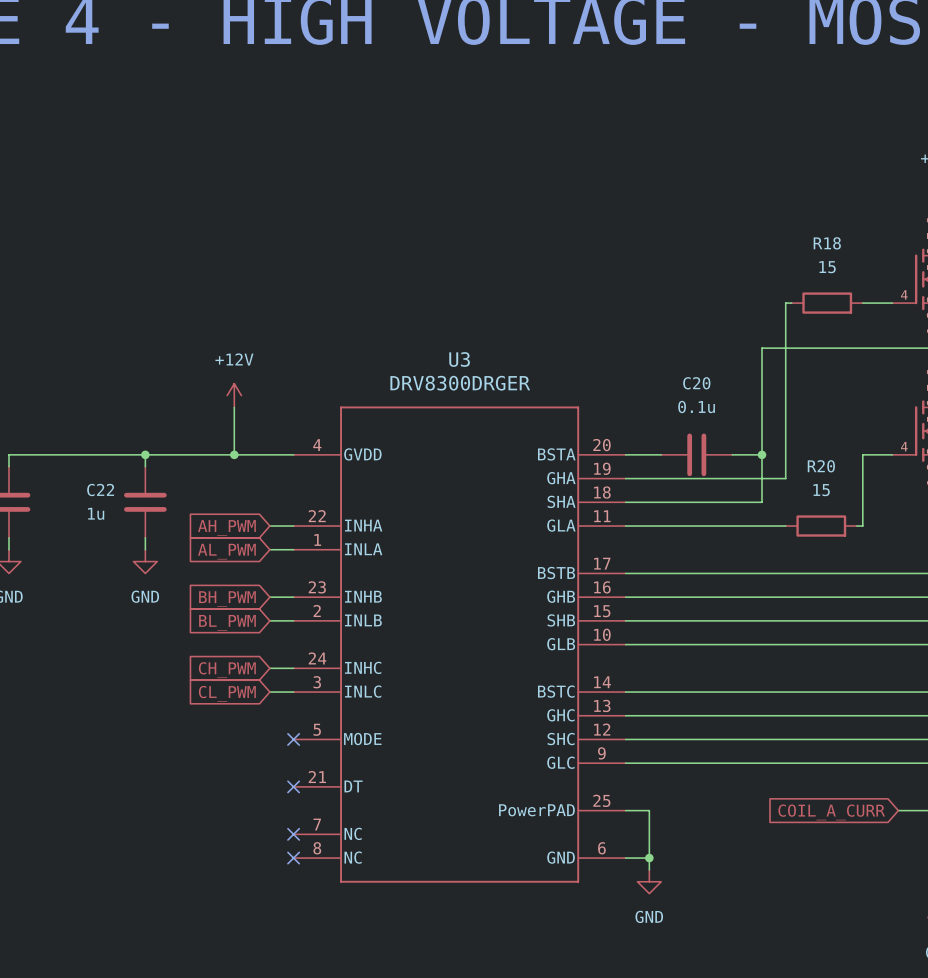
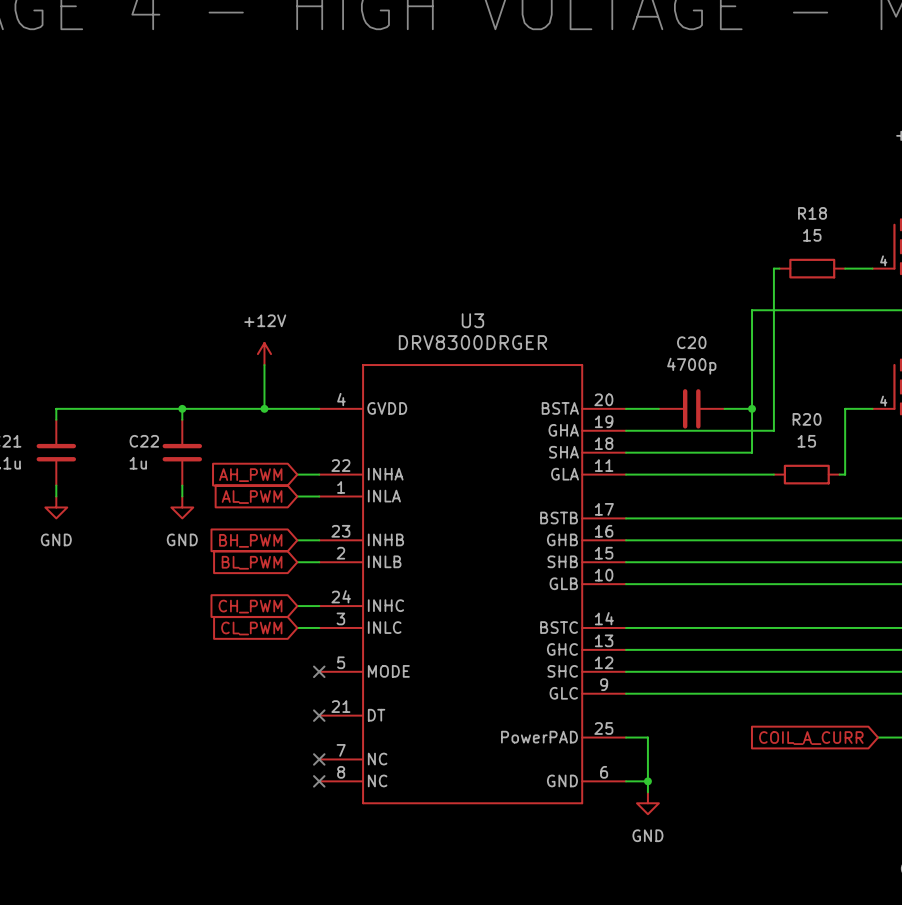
C20 value: 0.1u (696, 407) -> 4700p (691, 366)

